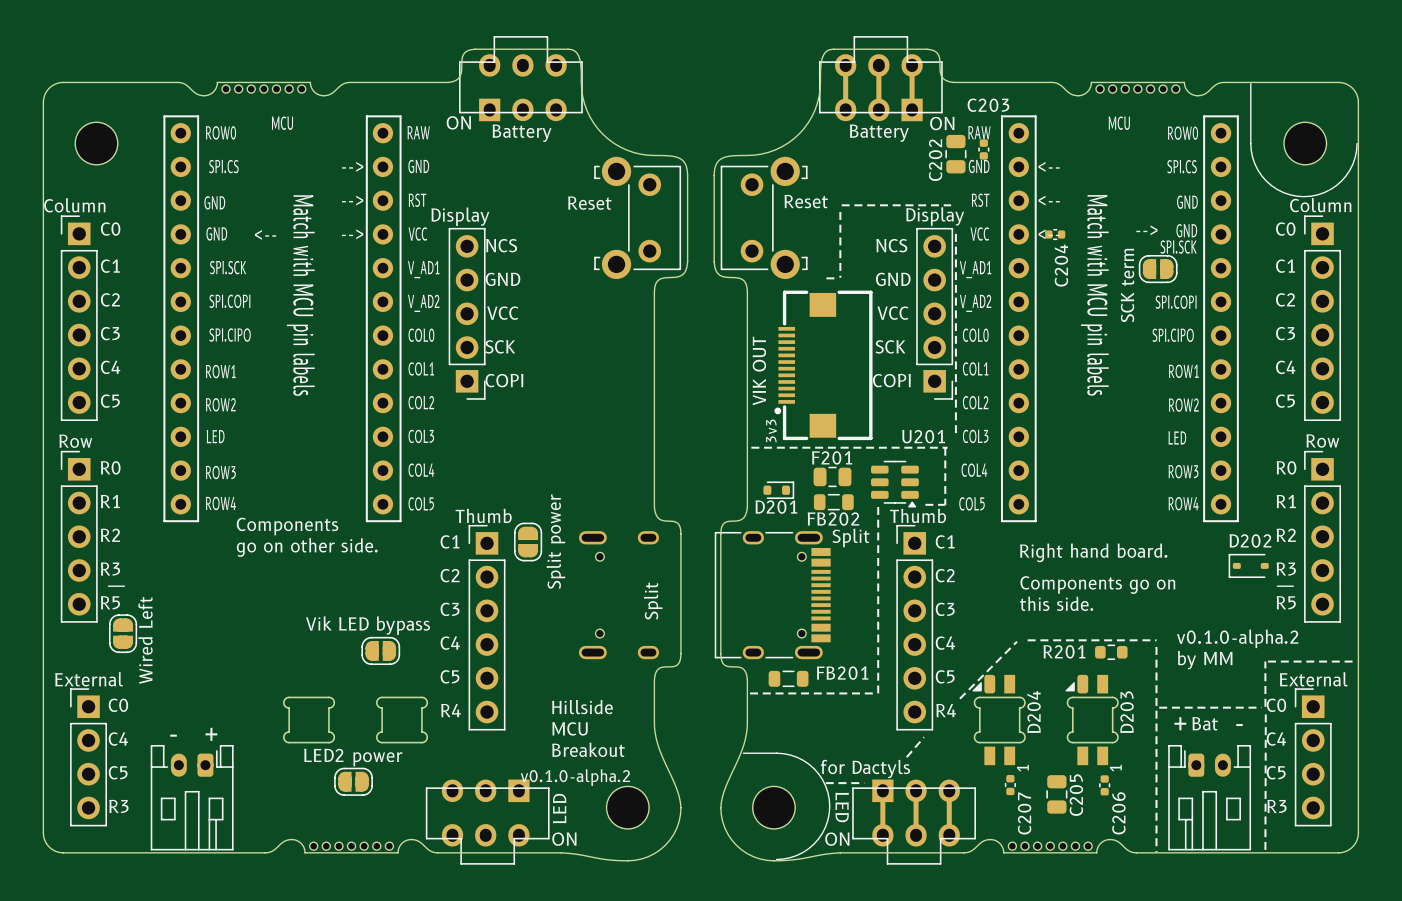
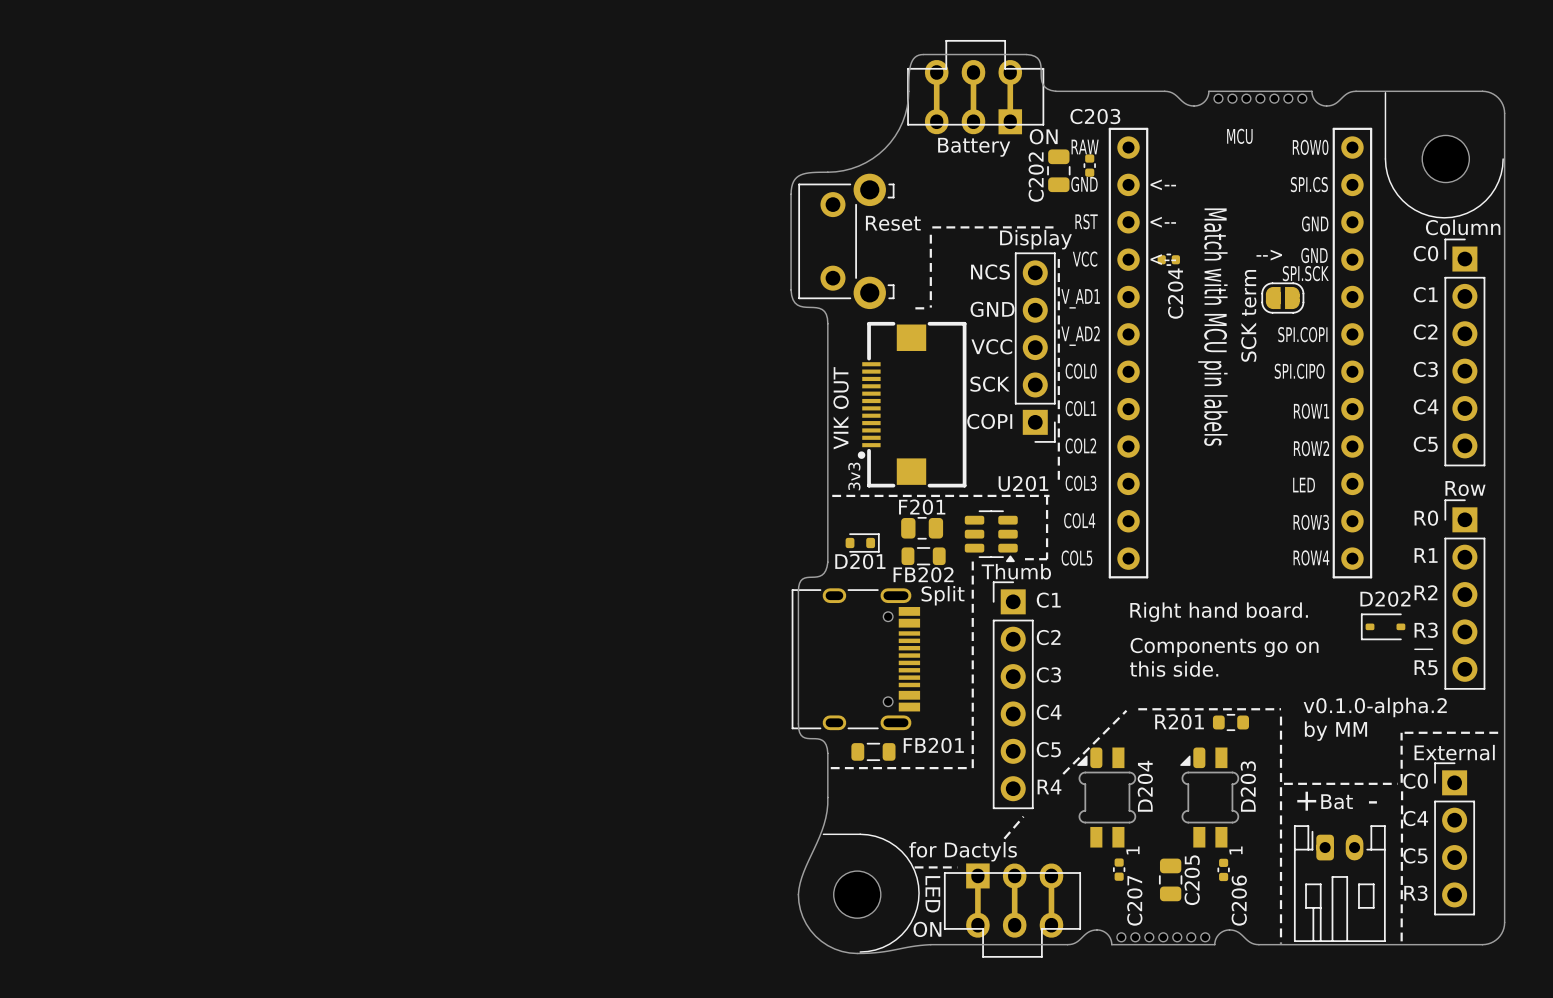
board edge: (475, 49) (574, 50) (580, 61) (584, 103) (589, 116) (602, 134) (613, 143) (633, 152) (678, 157) (684, 161) (686, 168) (687, 266) (684, 273) (679, 276) (659, 279) (655, 283) (654, 292) (654, 507) (659, 519) (675, 521) (678, 524) (680, 534) (680, 657) (675, 666) (659, 668) (654, 680) (656, 738) (680, 802) (679, 821) (673, 834) (665, 845) (654, 853) (641, 859) (627, 860) (561, 852) (435, 852) (430, 850) (419, 841) (411, 839) (401, 843) (398, 852) (305, 852) (301, 843) (291, 839) (285, 840) (273, 850) (265, 852) (63, 852) (53, 850) (46, 842) (43, 832) (43, 102) (46, 92) (53, 85) (63, 82) (179, 82) (185, 84) (196, 93) (204, 95) (213, 91) (217, 82) (310, 82) (315, 92) (325, 95) (347, 82) (452, 81) (460, 76) (463, 54) (467, 50) (475, 49) -> none
part: (520, 78) -> none
part: (263, 89) -> none
part: (96, 143) -> none
part: Reset (637, 217) -> none
part: (467, 313) -> none
part: (79, 318) -> none
part: (282, 318) -> none
text: Components (287, 526) -> none
part: (92, 536) -> none
part: Split power (528, 542) -> none
text: go on other side. (307, 547) -> none
part: (618, 595) -> none
part: Thumb (487, 627) -> none
part: Wired Left (123, 633) -> none
part: Vik LED bypass (380, 650) -> none
text: Hillside (582, 707) -> none
part: (309, 720) -> none
part: (402, 720) -> none
text: MCU (569, 728) -> none
text: Breakout (588, 749) -> none
part: (88, 757) -> none
text: v0.1.0-alpha.2 (575, 777) -> none
part: LED2 power (353, 781) -> none
part: (192, 797) -> none
part: (627, 807) -> none
part: (487, 822) -> none
part: (351, 846) -> none

